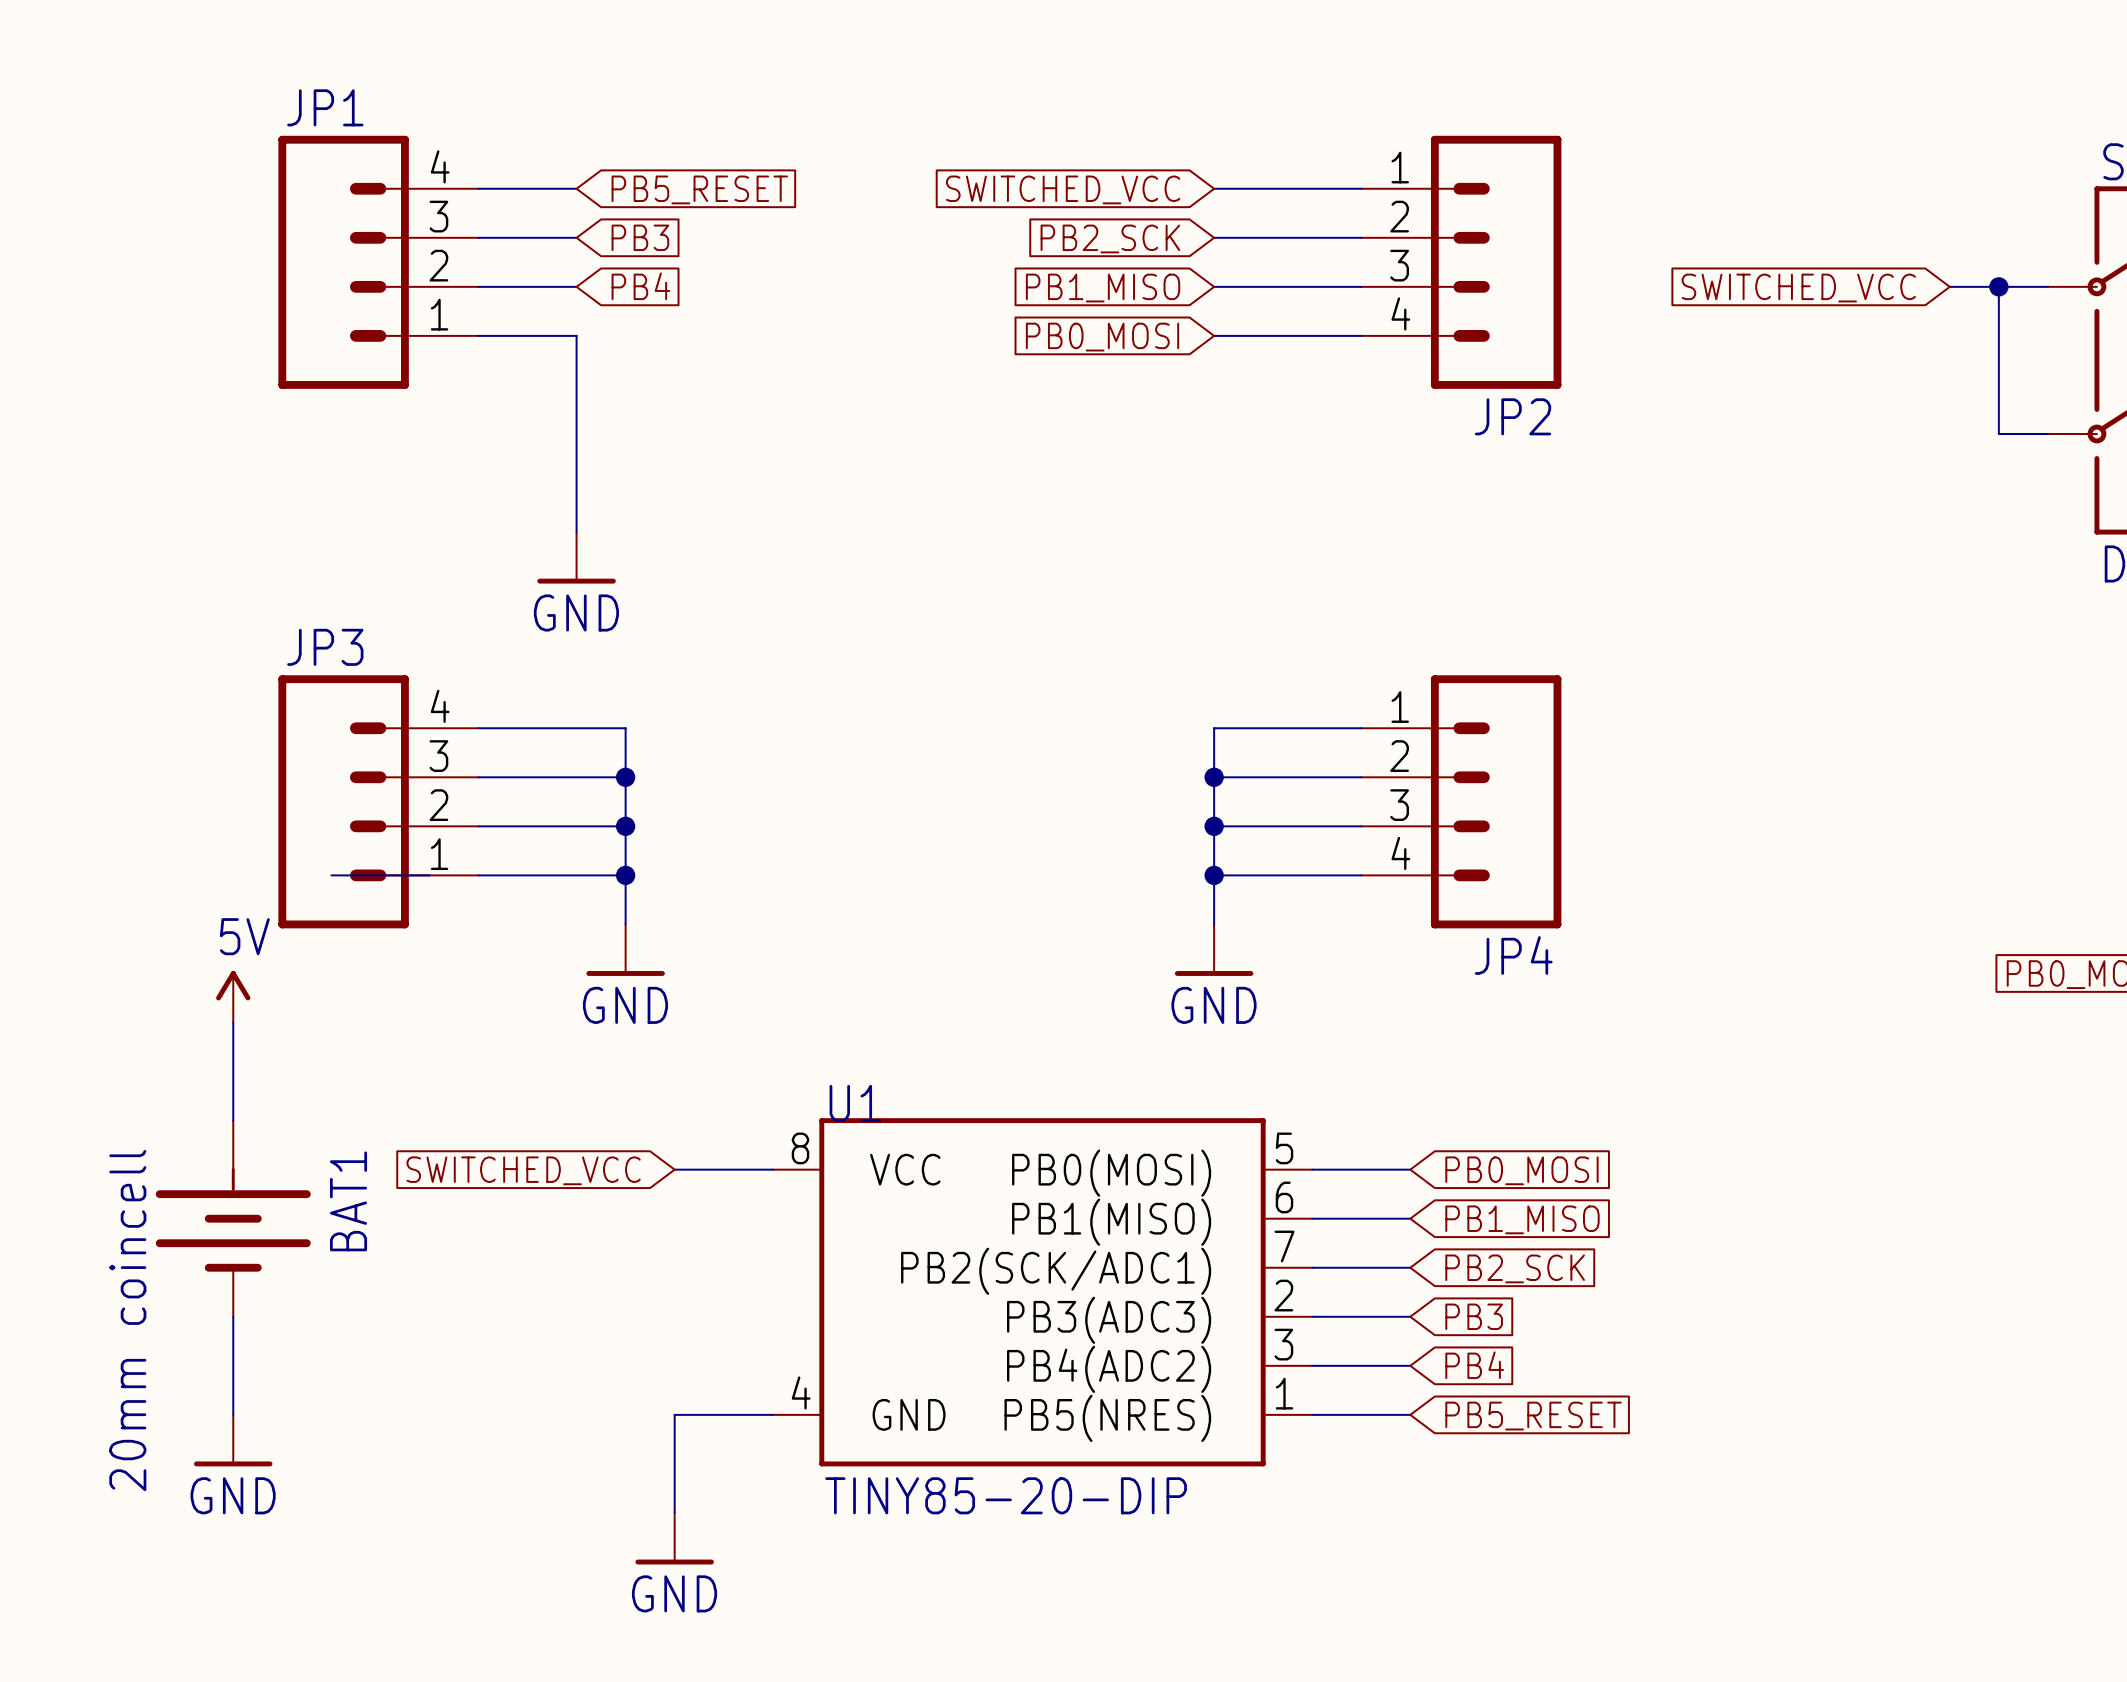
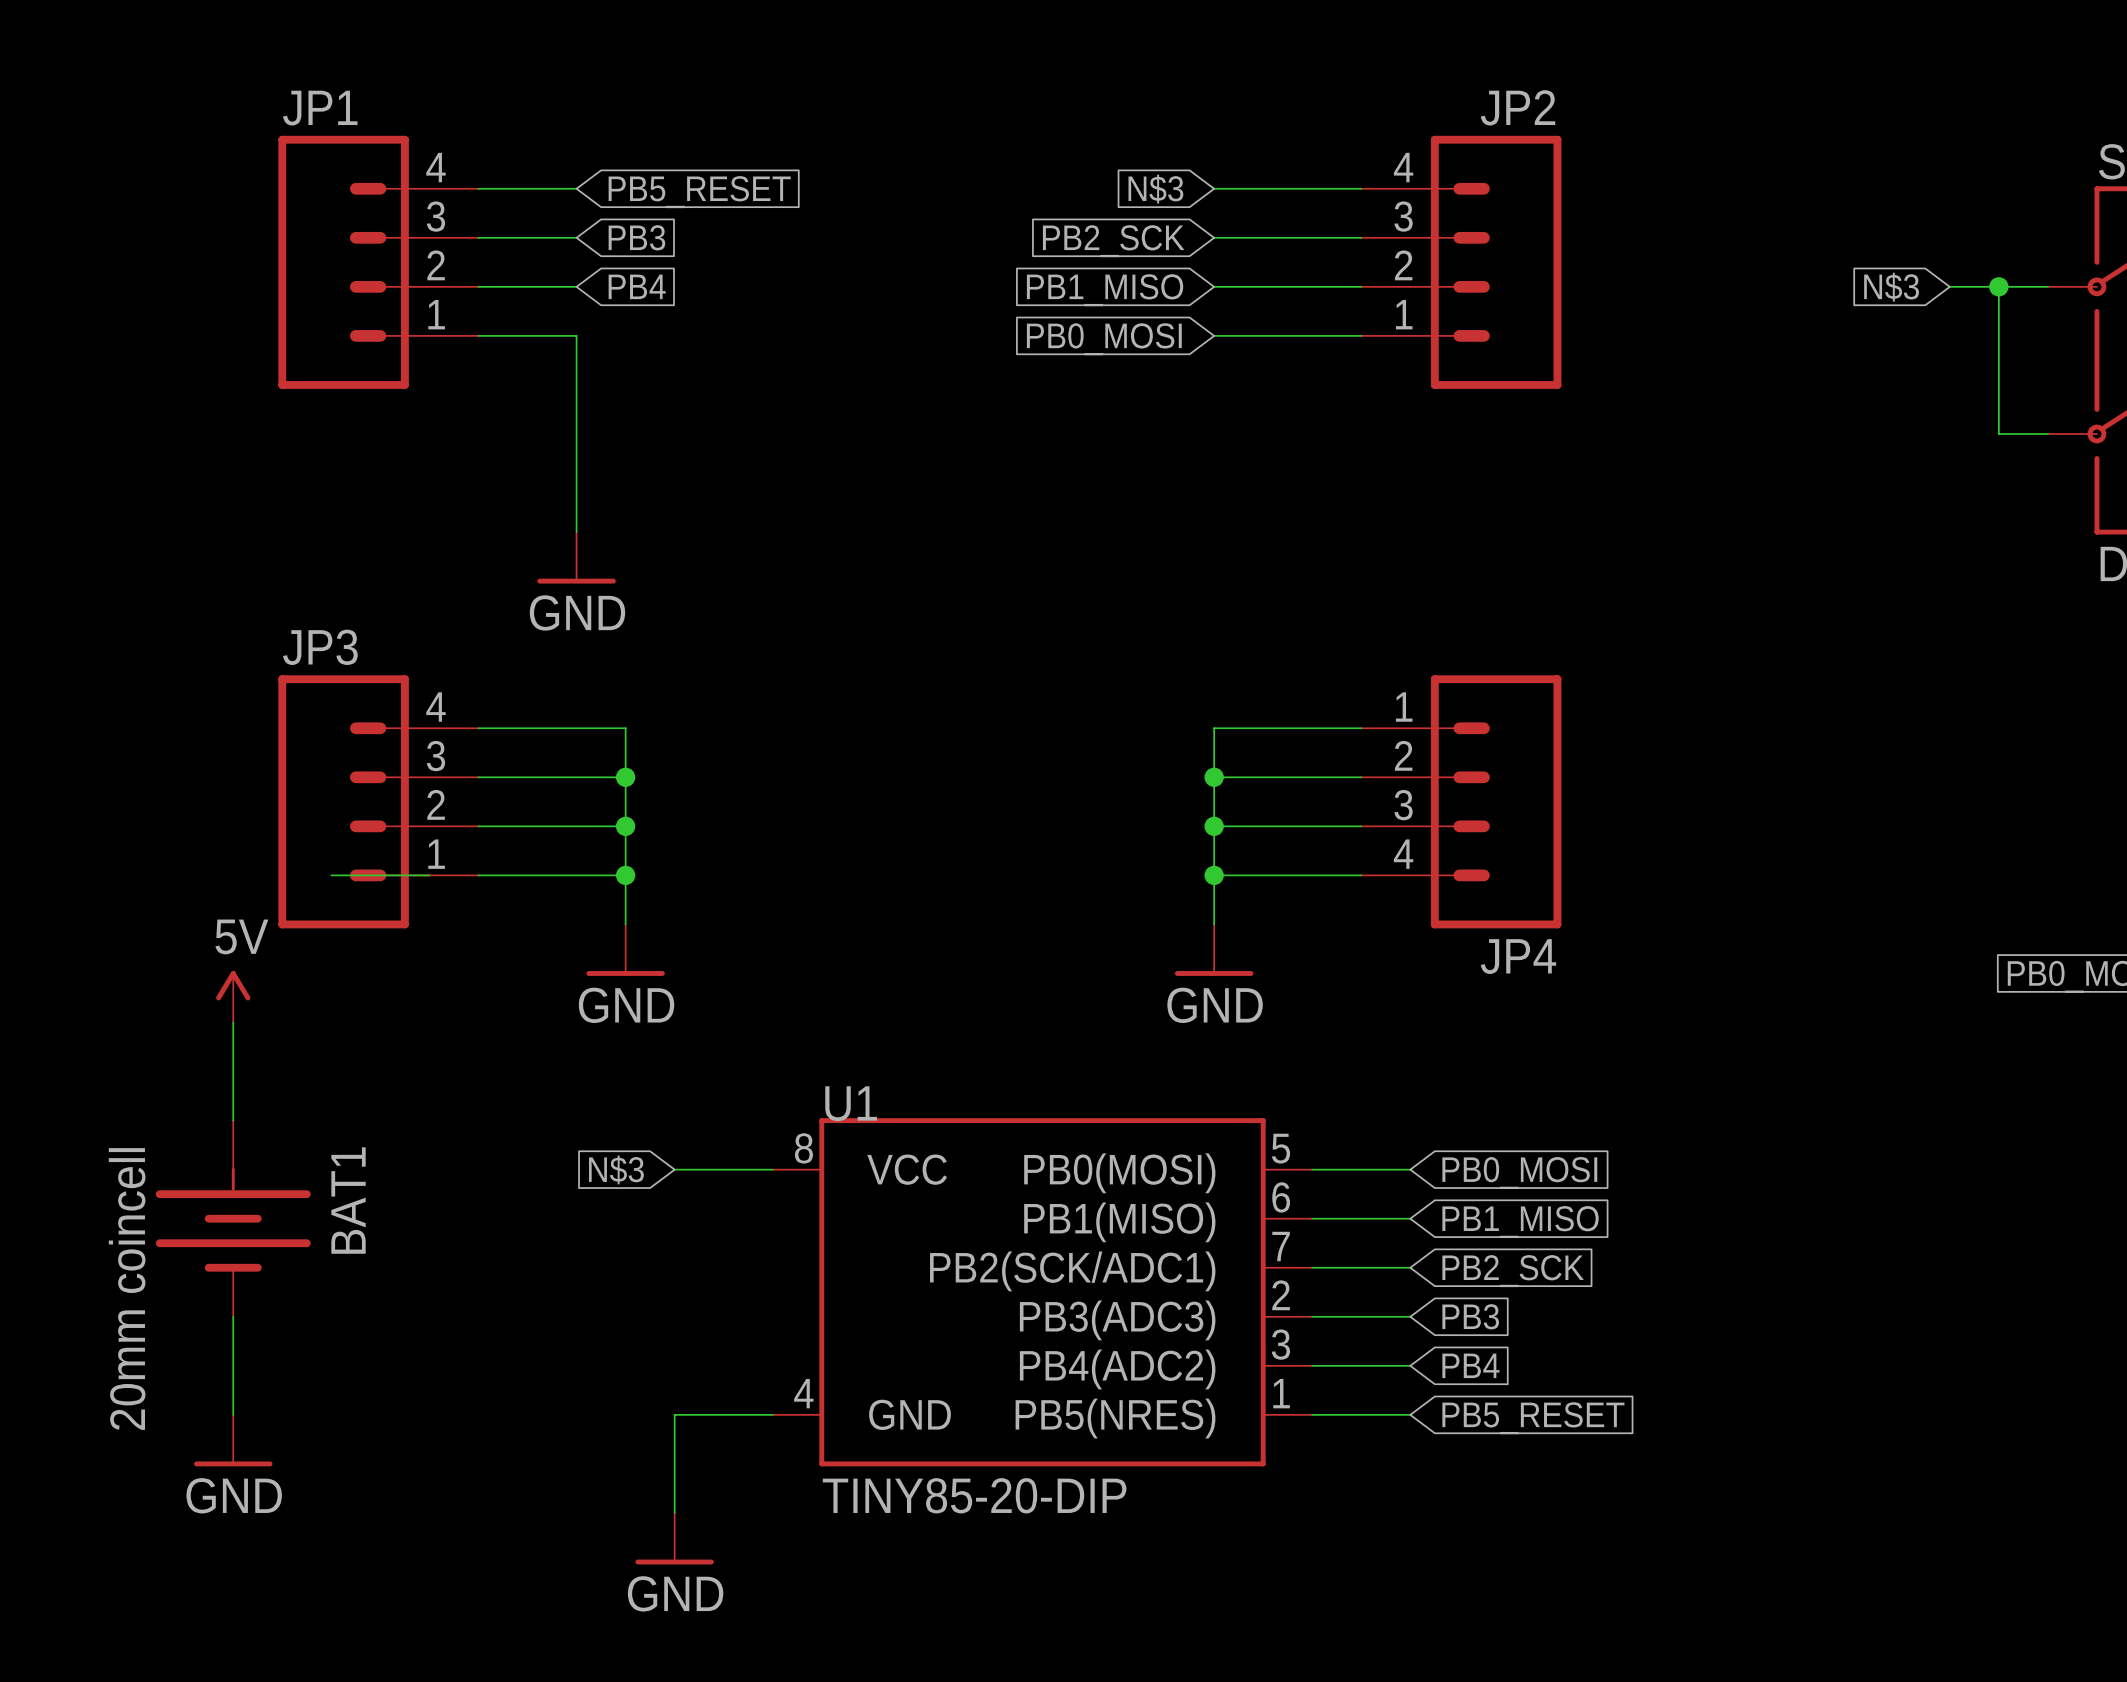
global label: SWITCHED_VCC (1063, 189) -> N$3 (1155, 189)
JP2 flip: as is (1496, 262) -> up-down (1496, 262)
global label: SWITCHED_VCC (1798, 288) -> N$3 (1891, 287)
global label: SWITCHED_VCC (523, 1170) -> N$3 (616, 1169)

